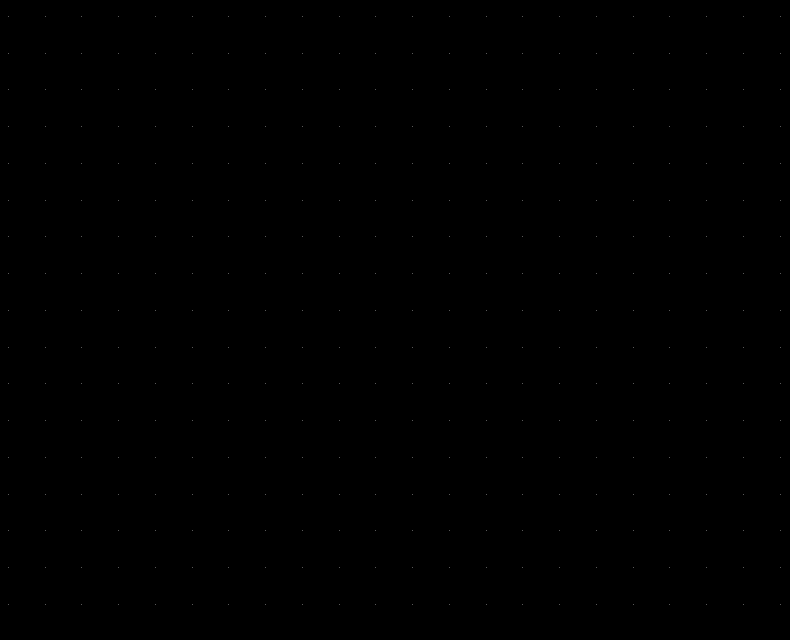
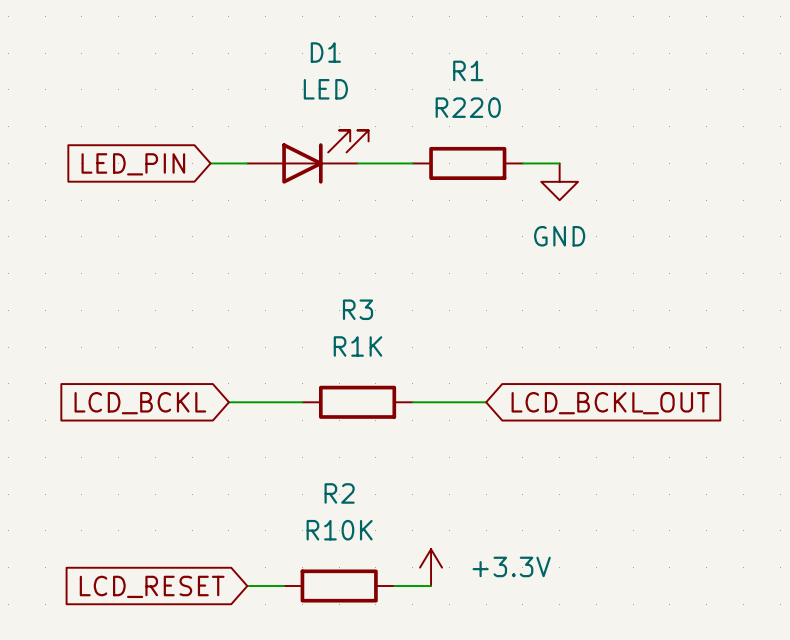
D1: none -> LED (307, 157)
wire: none -> (210, 163) (247, 163)
wire: none -> (357, 163) (412, 163)
R1: none -> R220 (467, 163)
wire: none -> (522, 163) (559, 163)
global label: none -> LED_PIN (133, 164)
power symbol: none -> GND (559, 181)
wire: none -> (228, 402) (302, 402)
R3: none -> R1K (357, 402)
wire: none -> (412, 402) (486, 402)
global label: none -> LCD_BCKL (140, 403)
global label: none -> LCD_BCKL_OUT (610, 403)
power symbol: none -> +3.3V (431, 567)
wire: none -> (247, 586) (284, 586)
R2: none -> R10K (339, 586)
wire: none -> (394, 586) (431, 586)
global label: none -> LCD_RESET (152, 586)

